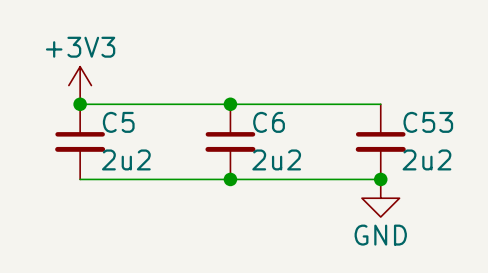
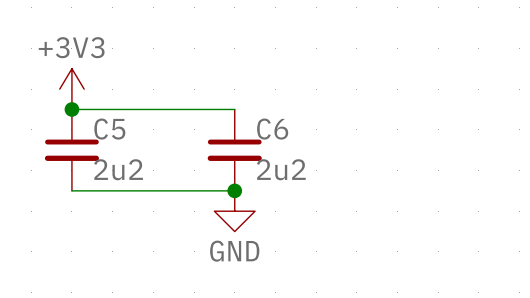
wire: (230, 104) (380, 104) -> none
junction: (230, 104) -> none
C53: 2u2 (380, 141) -> none
wire: (230, 179) (380, 179) -> none
junction: (380, 179) -> none
power symbol position: GND (380, 198) -> GND (234, 211)

